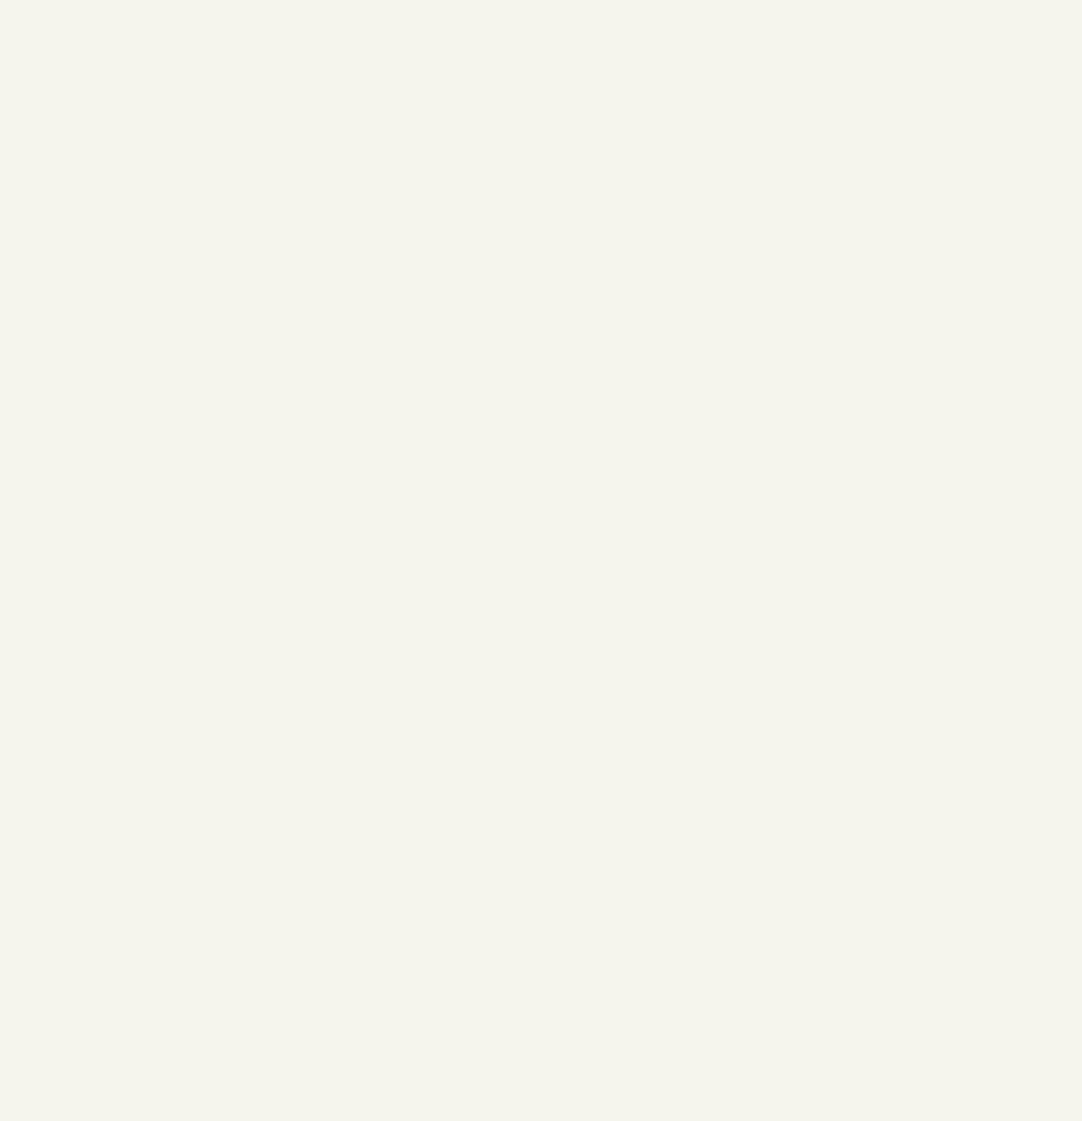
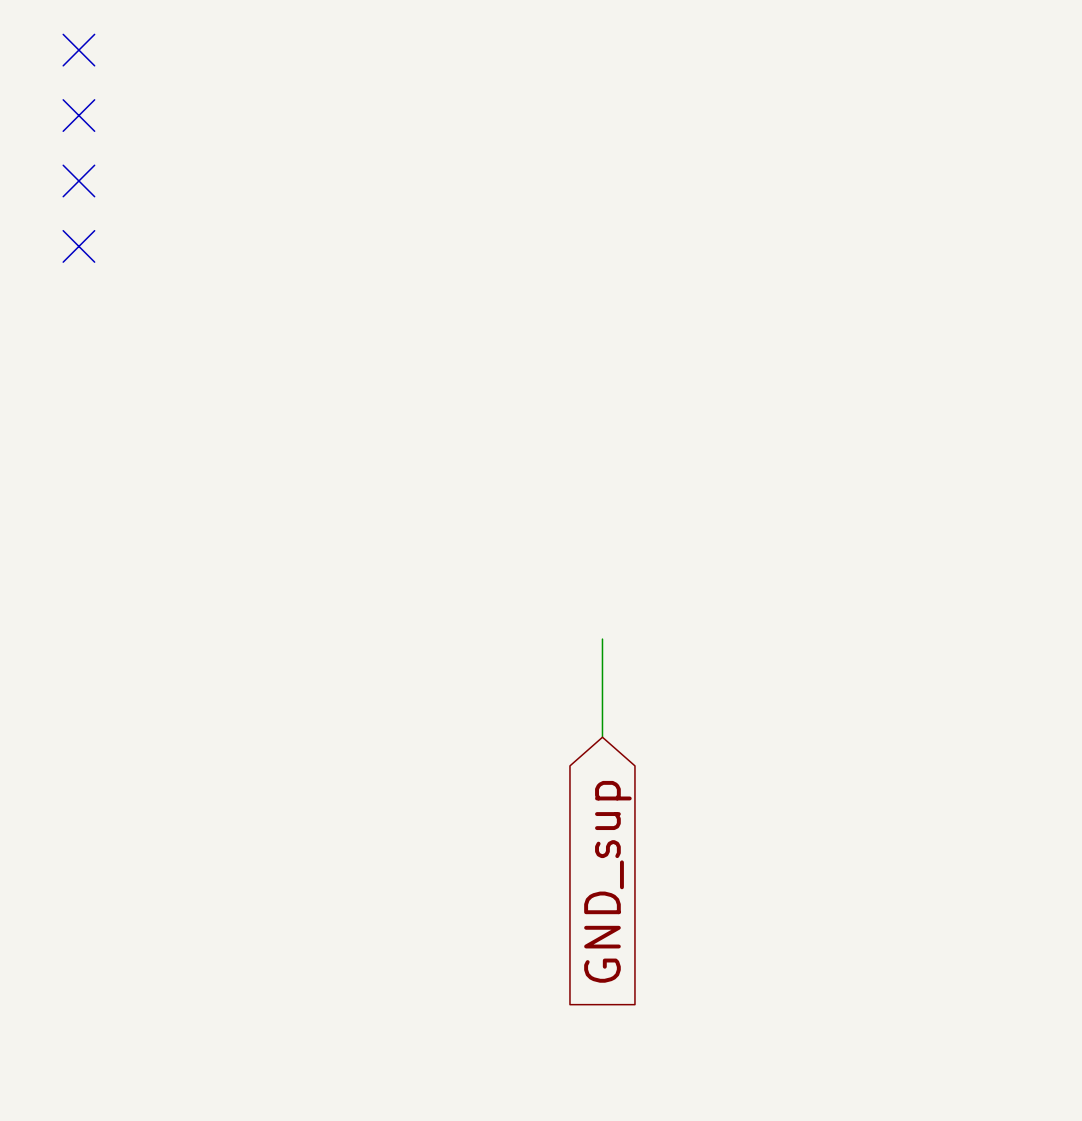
no-connect mark: none -> (78, 50)
no-connect mark: none -> (78, 115)
no-connect mark: none -> (78, 180)
no-connect mark: none -> (78, 246)
wire: none -> (602, 639) (602, 737)
global label: none -> GND_sup (607, 881)

